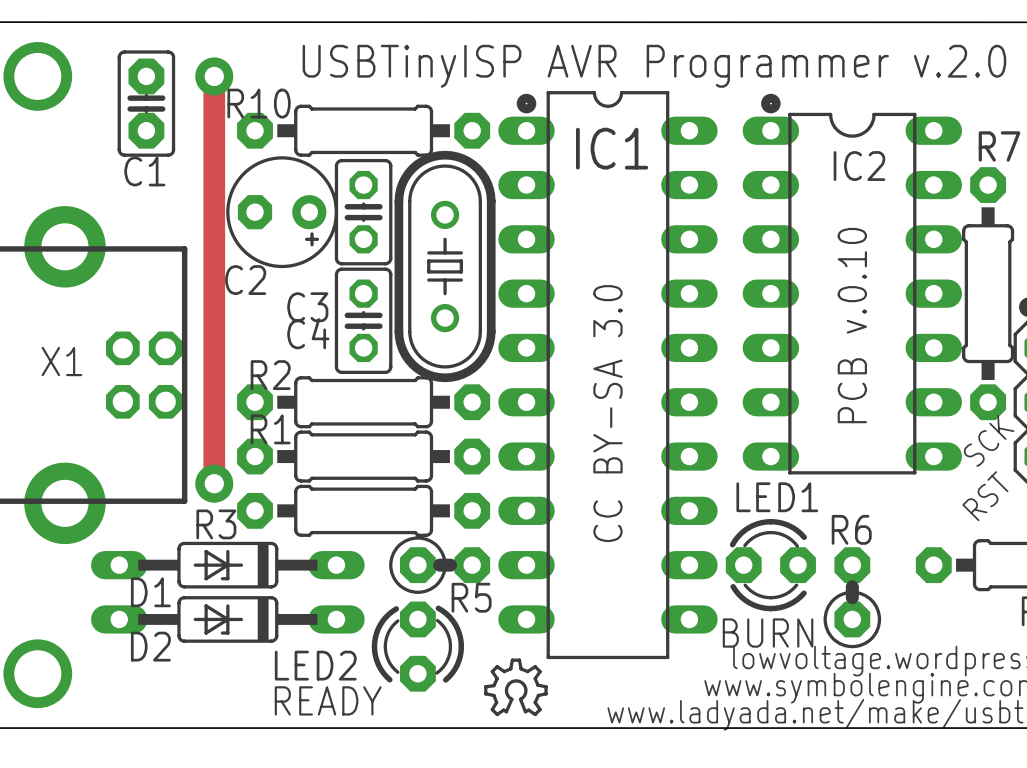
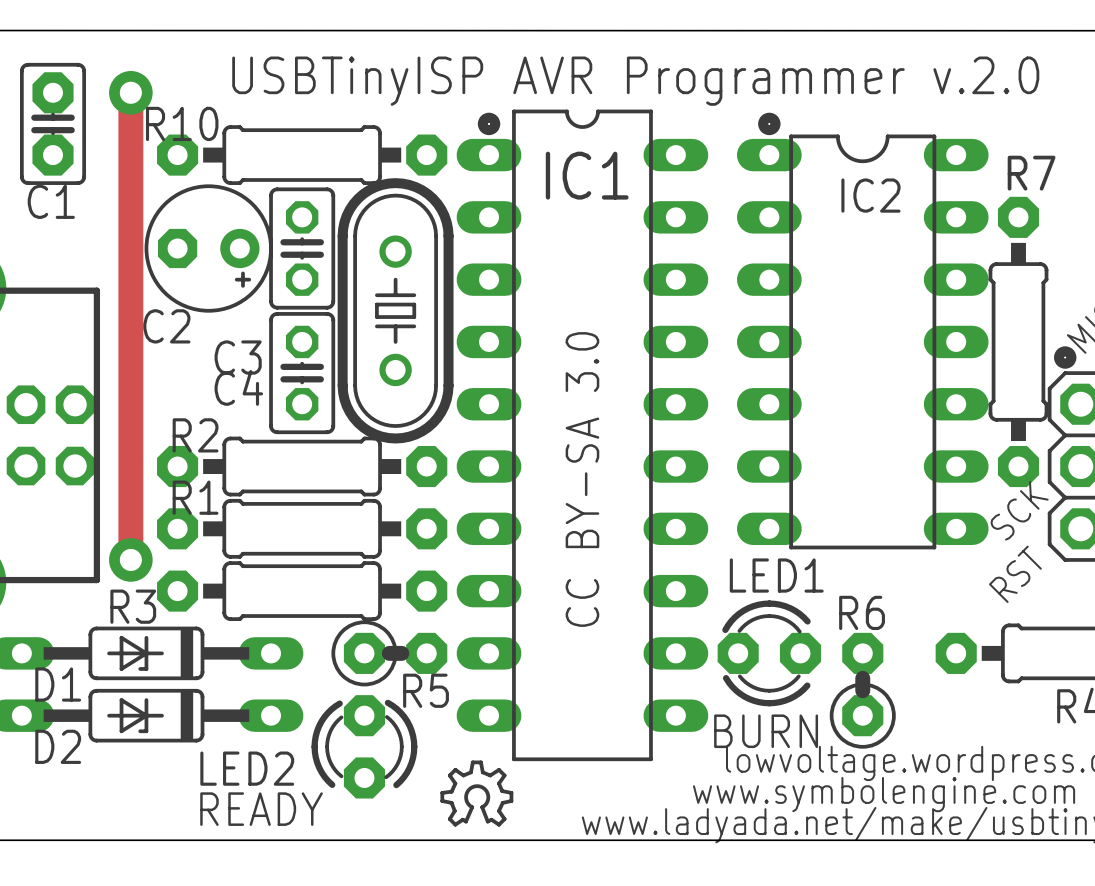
text: PCB v.0.10 (852, 325) -> none

